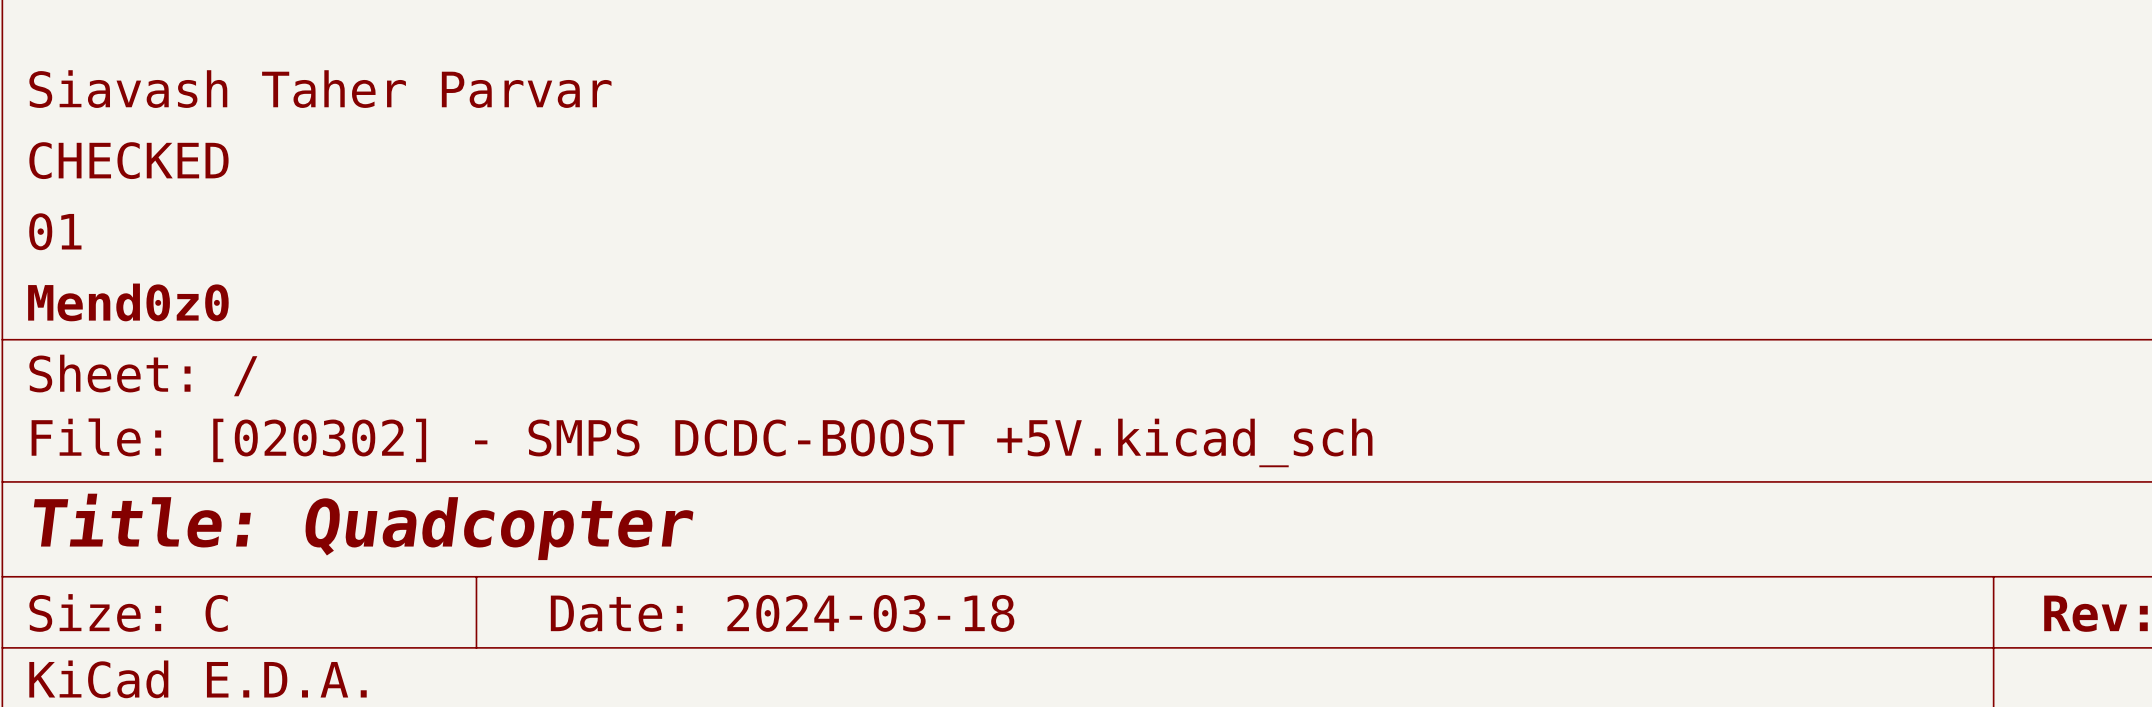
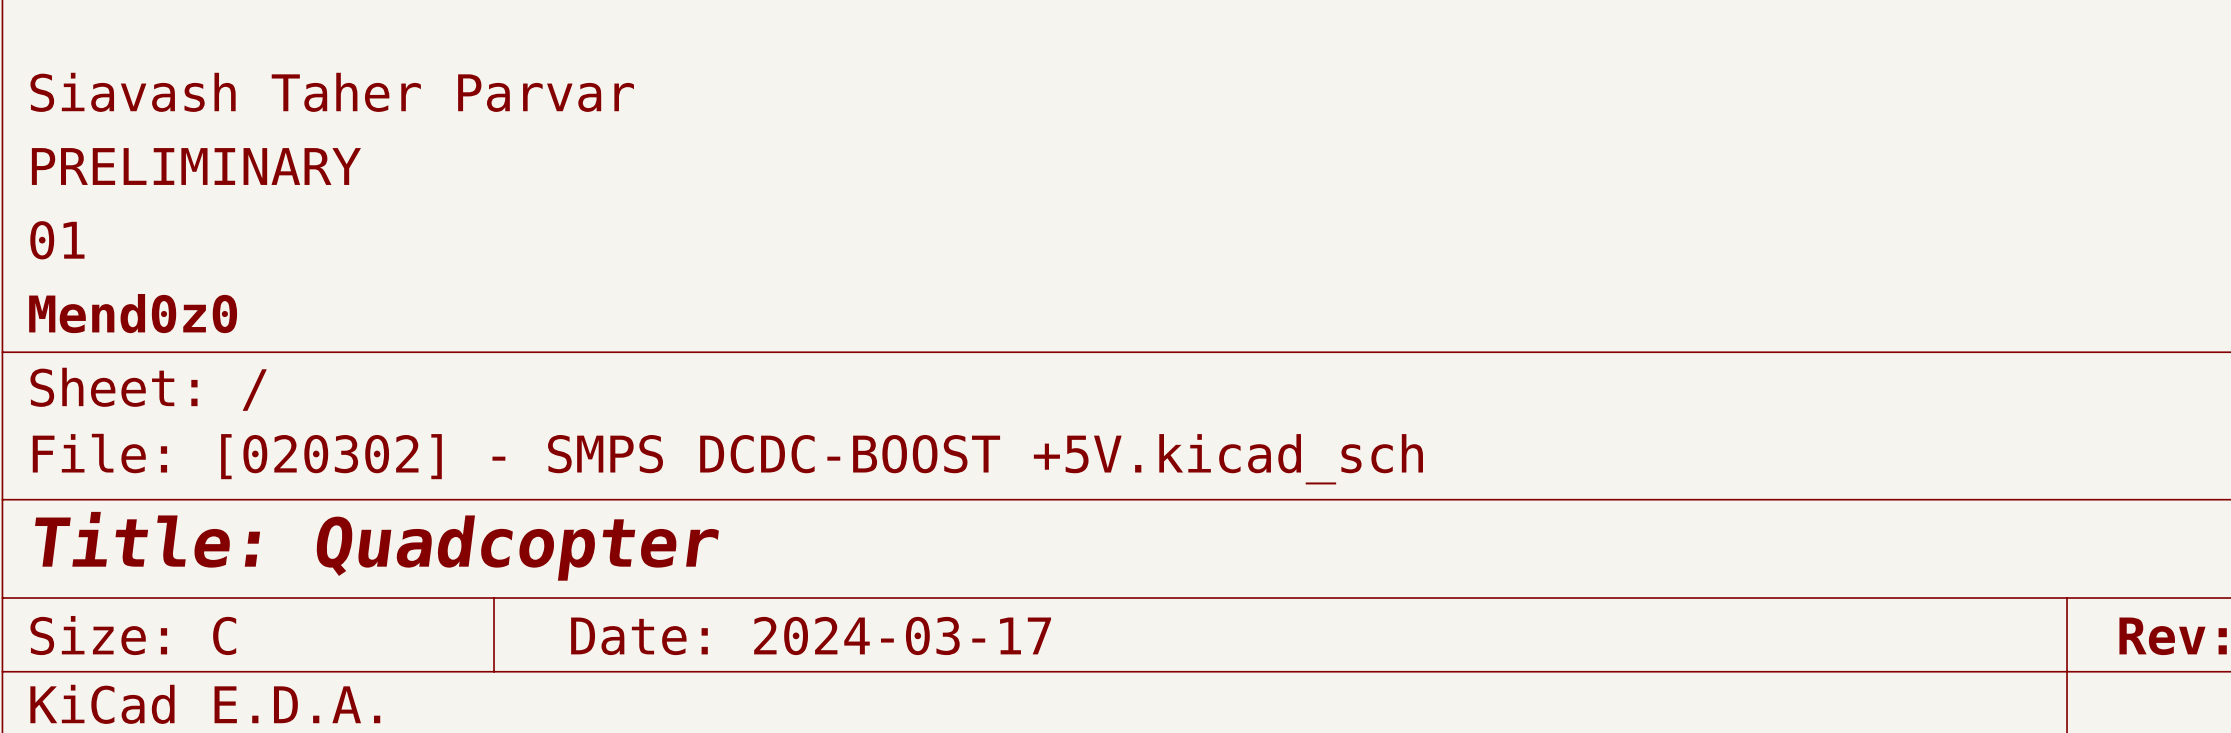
title block: CHECKED (128, 160) -> PRELIMINARY (196, 166)
title block: Date: 2024-03-18 (782, 613) -> Date: 2024-03-17 (811, 635)

